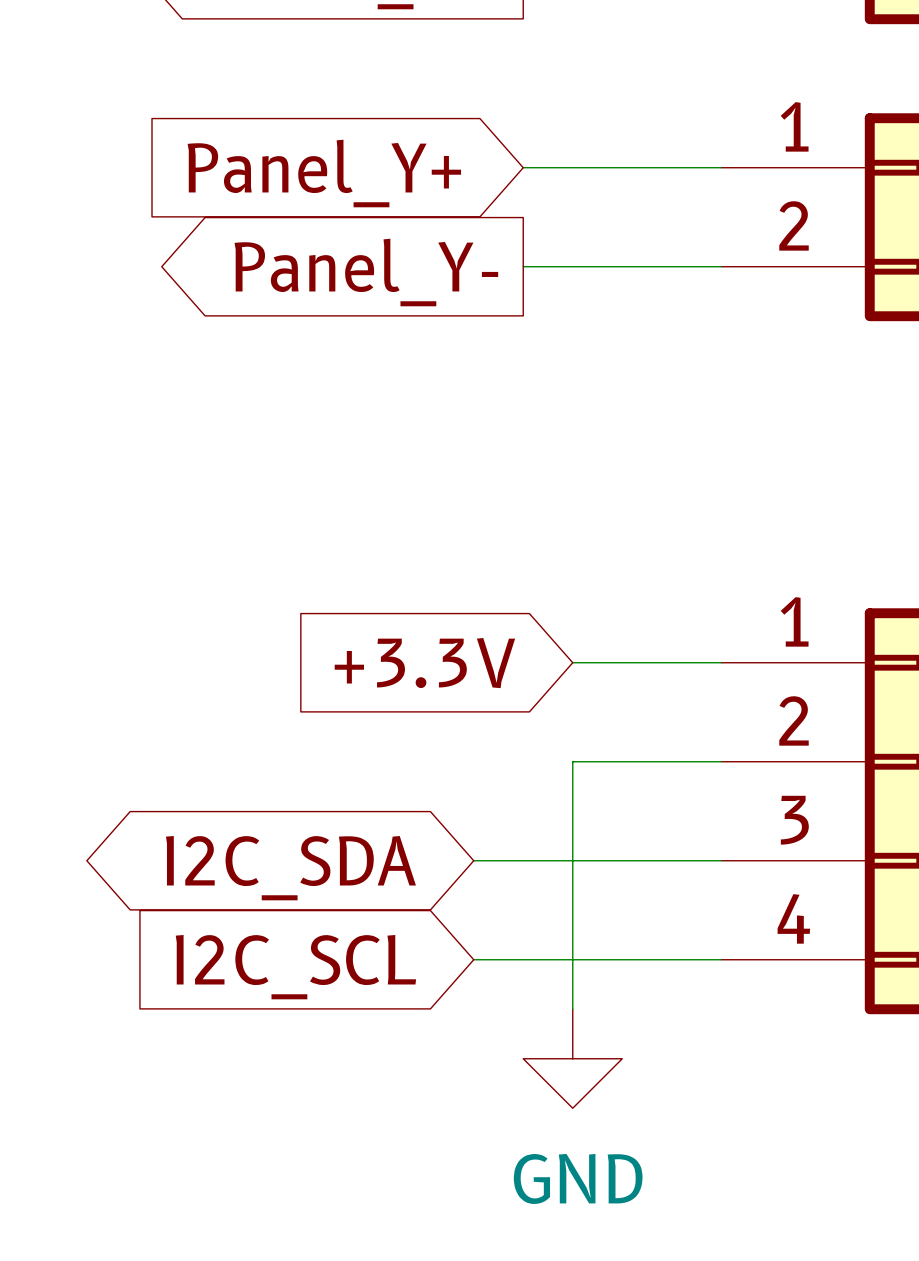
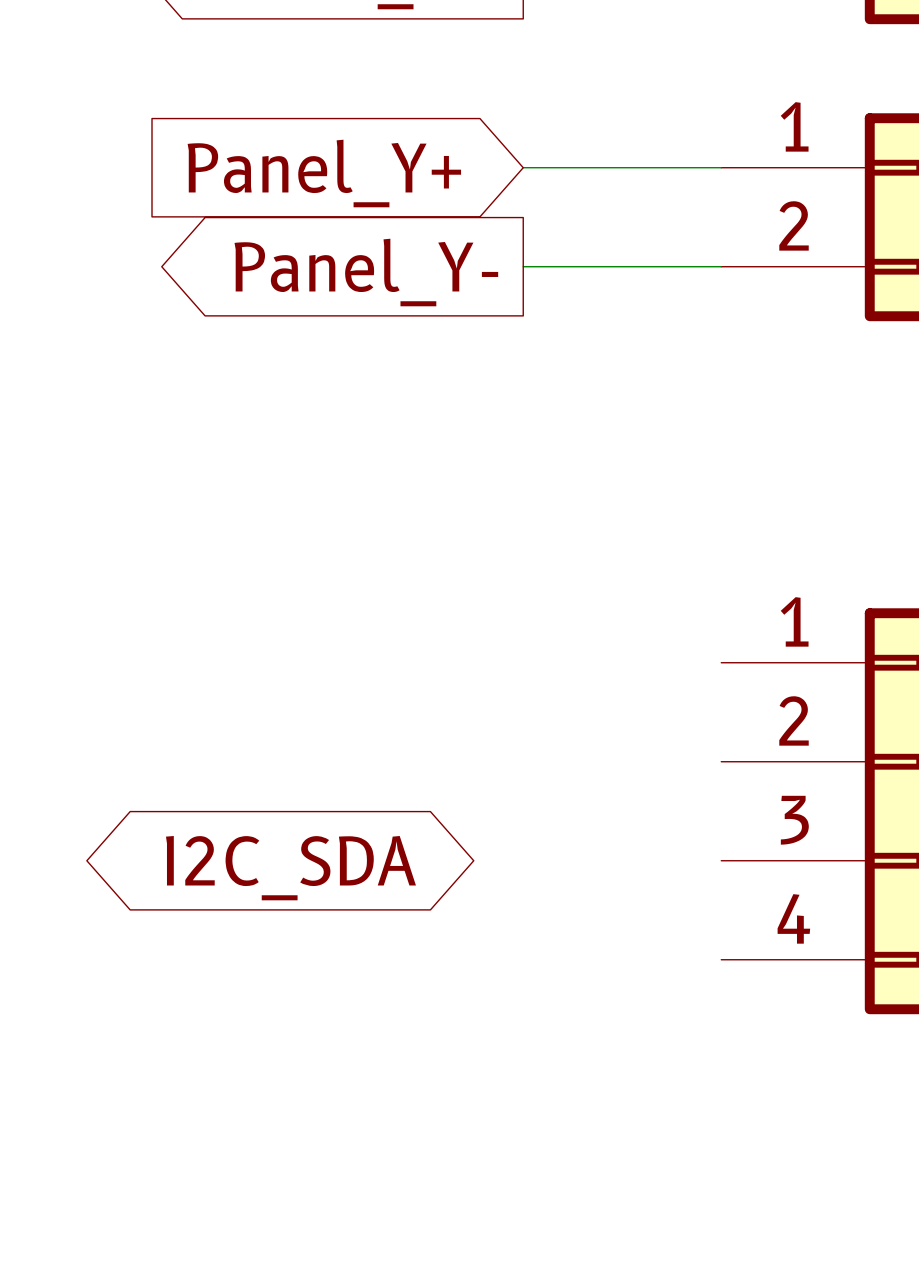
wire: (572, 662) (721, 662) -> none
global label: +3.3V (424, 663) -> none
wire: (721, 761) (572, 761) (572, 1009) -> none
wire: (473, 860) (721, 860) -> none
wire: (473, 959) (721, 959) -> none
global label: I2C_SCL (295, 967) -> none
power symbol: GND (572, 1058) -> none

